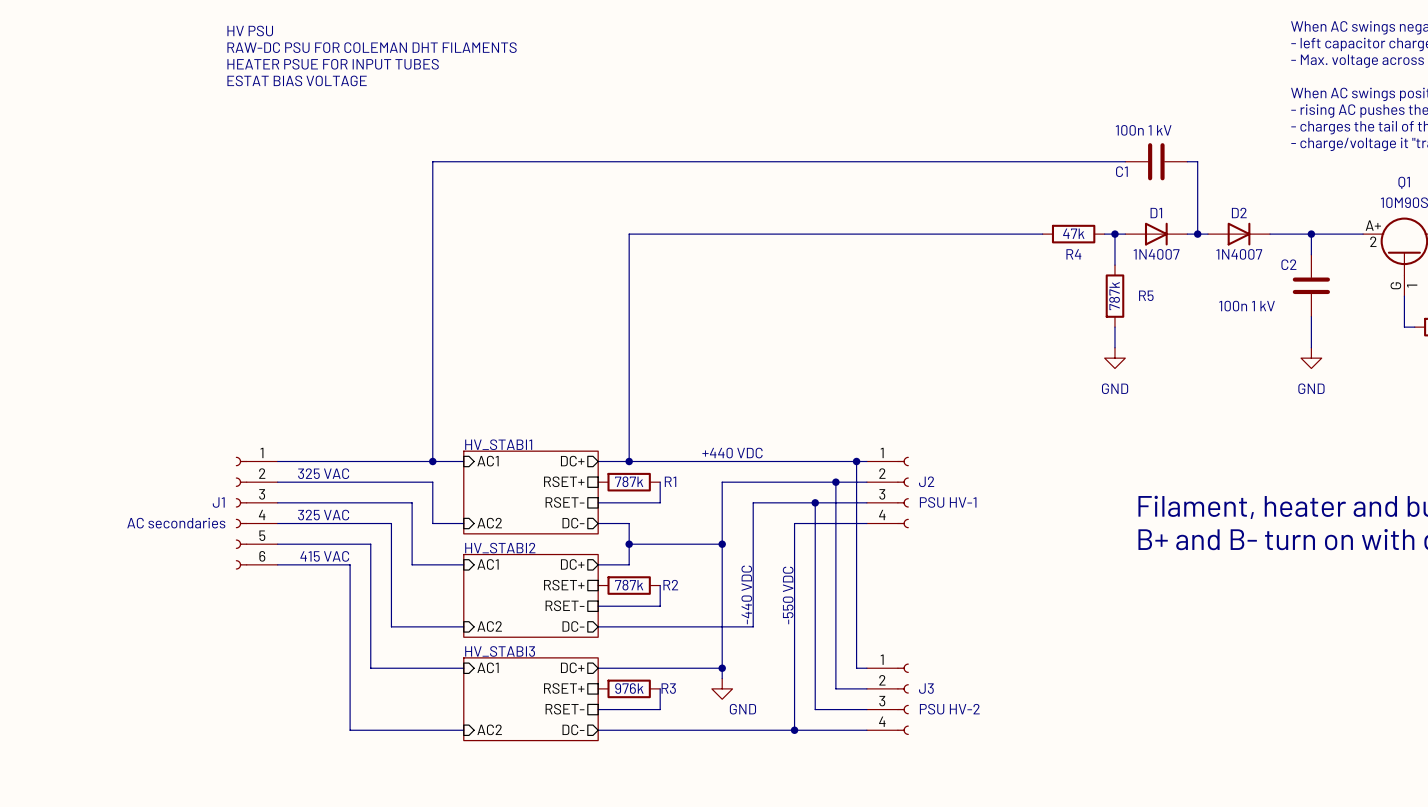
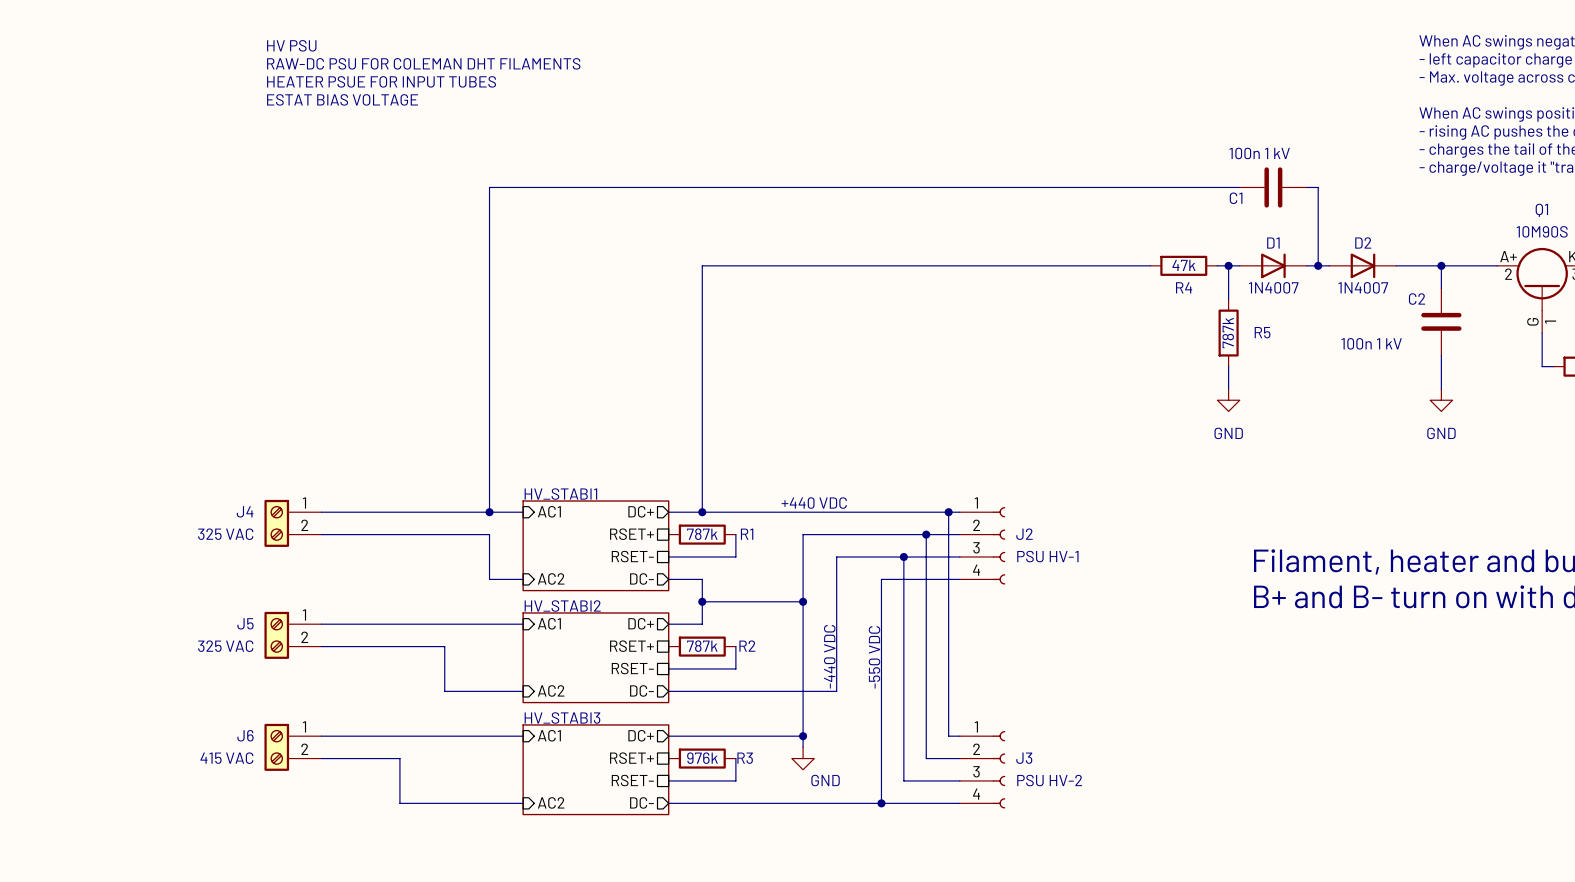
J4: none -> 325 VAC (293, 523)
text: 325 VAC (323, 473) -> none
wire: (277, 502) (412, 502) (412, 564) -> (399, 624) (467, 624)
J1: AC secondaries (256, 513) -> none
text: 325 VAC (323, 515) -> none
wire: (277, 523) (391, 523) (391, 585) -> (321, 646) (444, 646)
wire: (277, 544) (370, 544) (370, 668) -> (321, 736) (422, 736)
text: 415 VAC (324, 556) -> none
wire: (350, 564) (350, 688) -> (321, 758) (399, 758)
J5: none -> 325 VAC (293, 635)
J6: none -> 415 VAC (293, 747)

